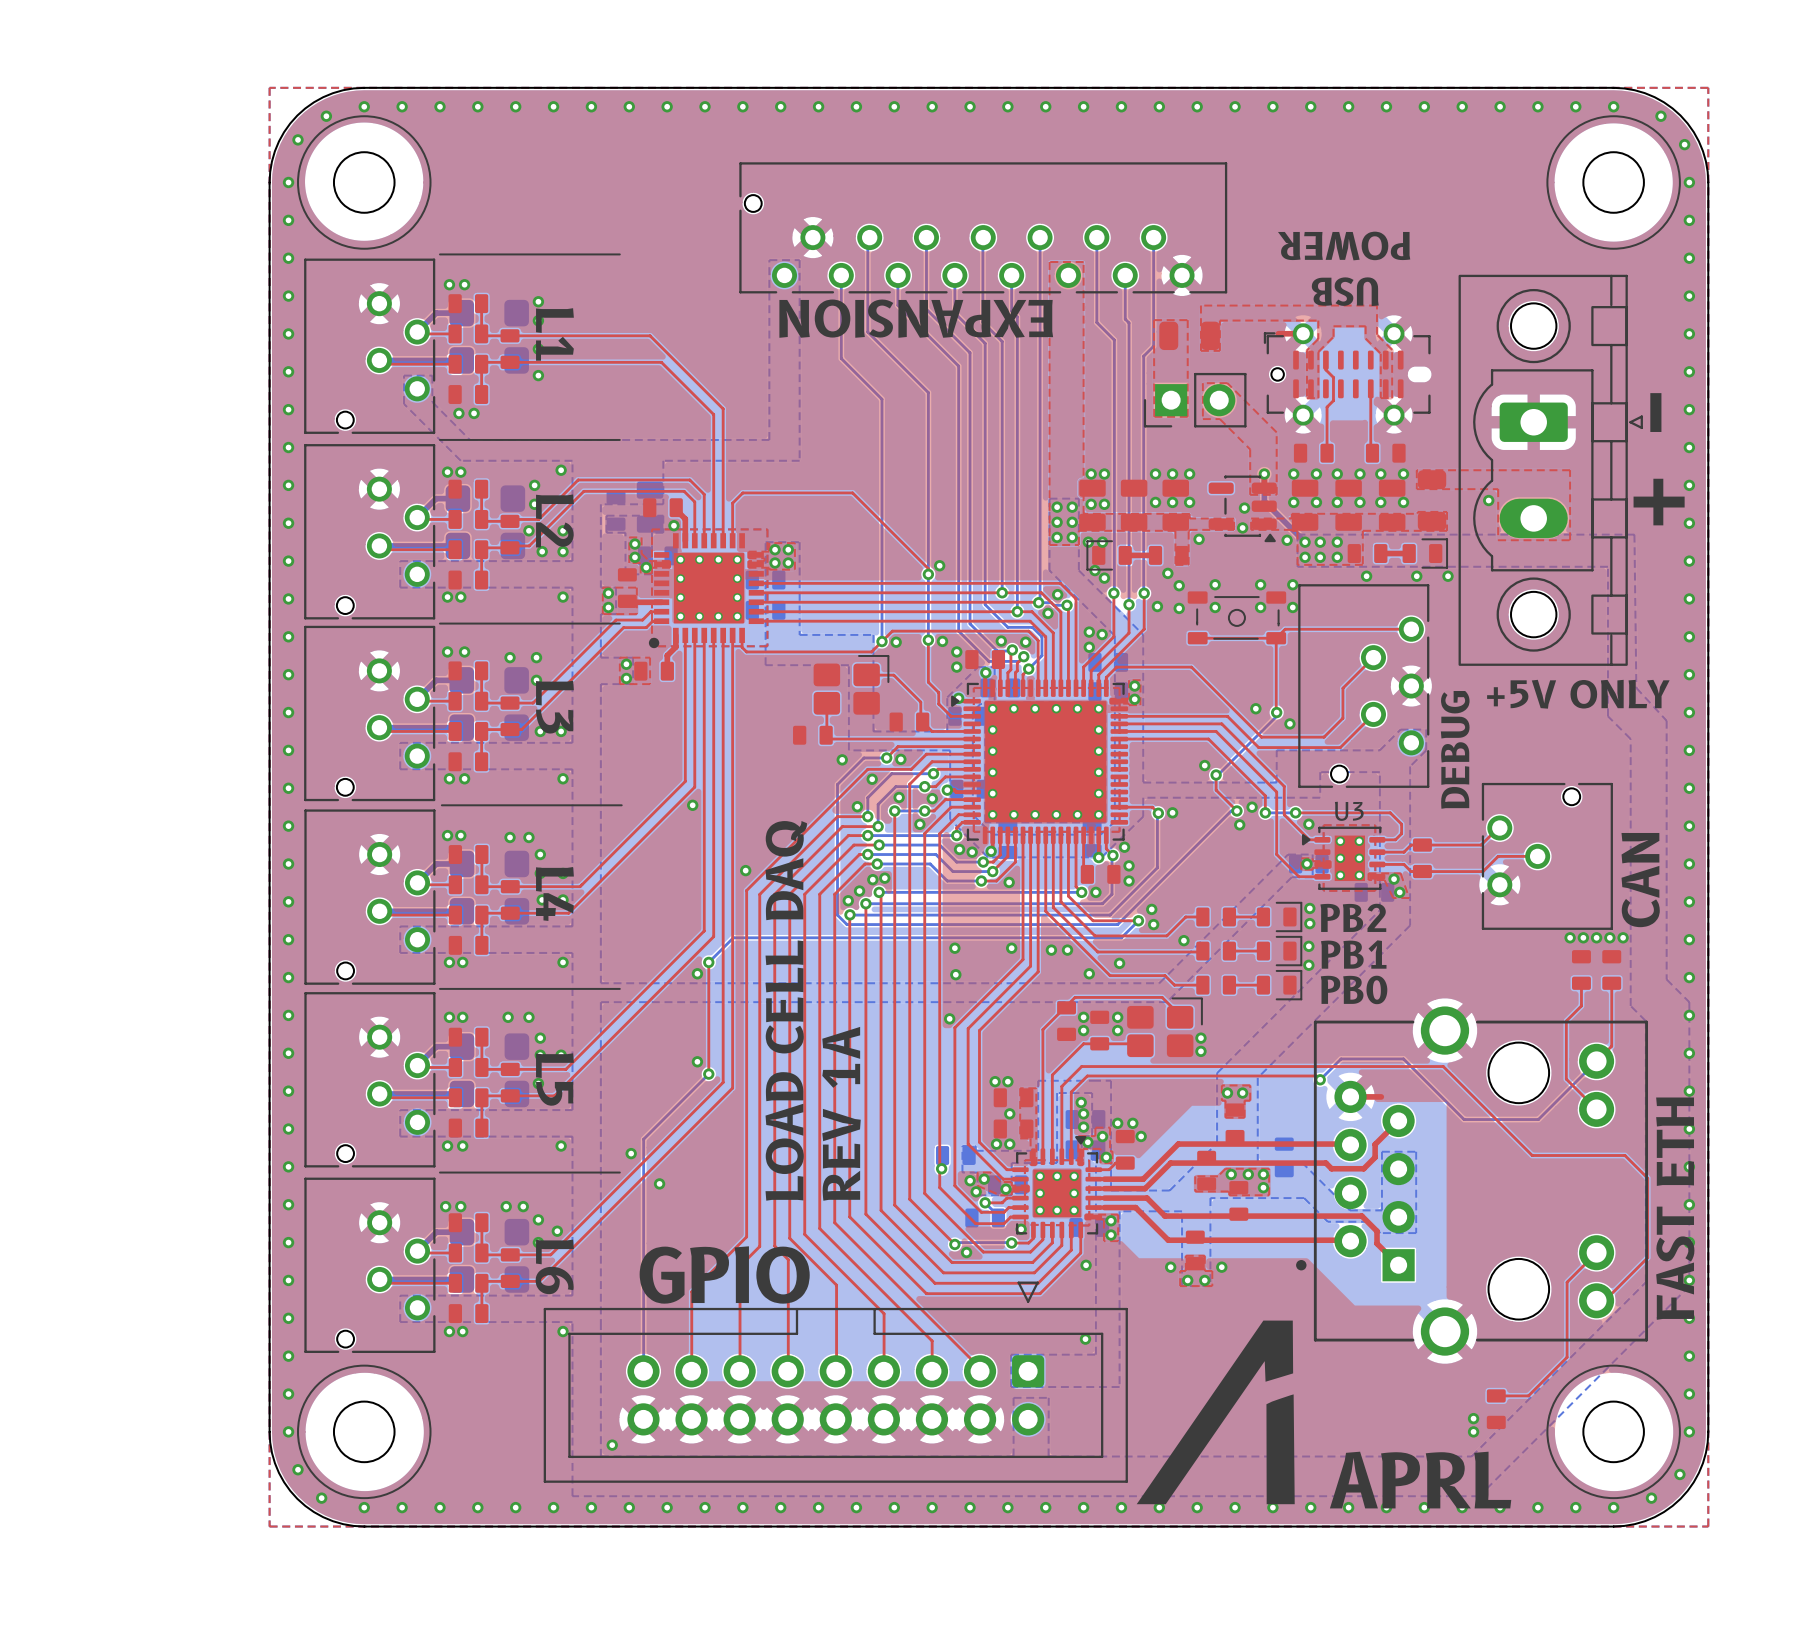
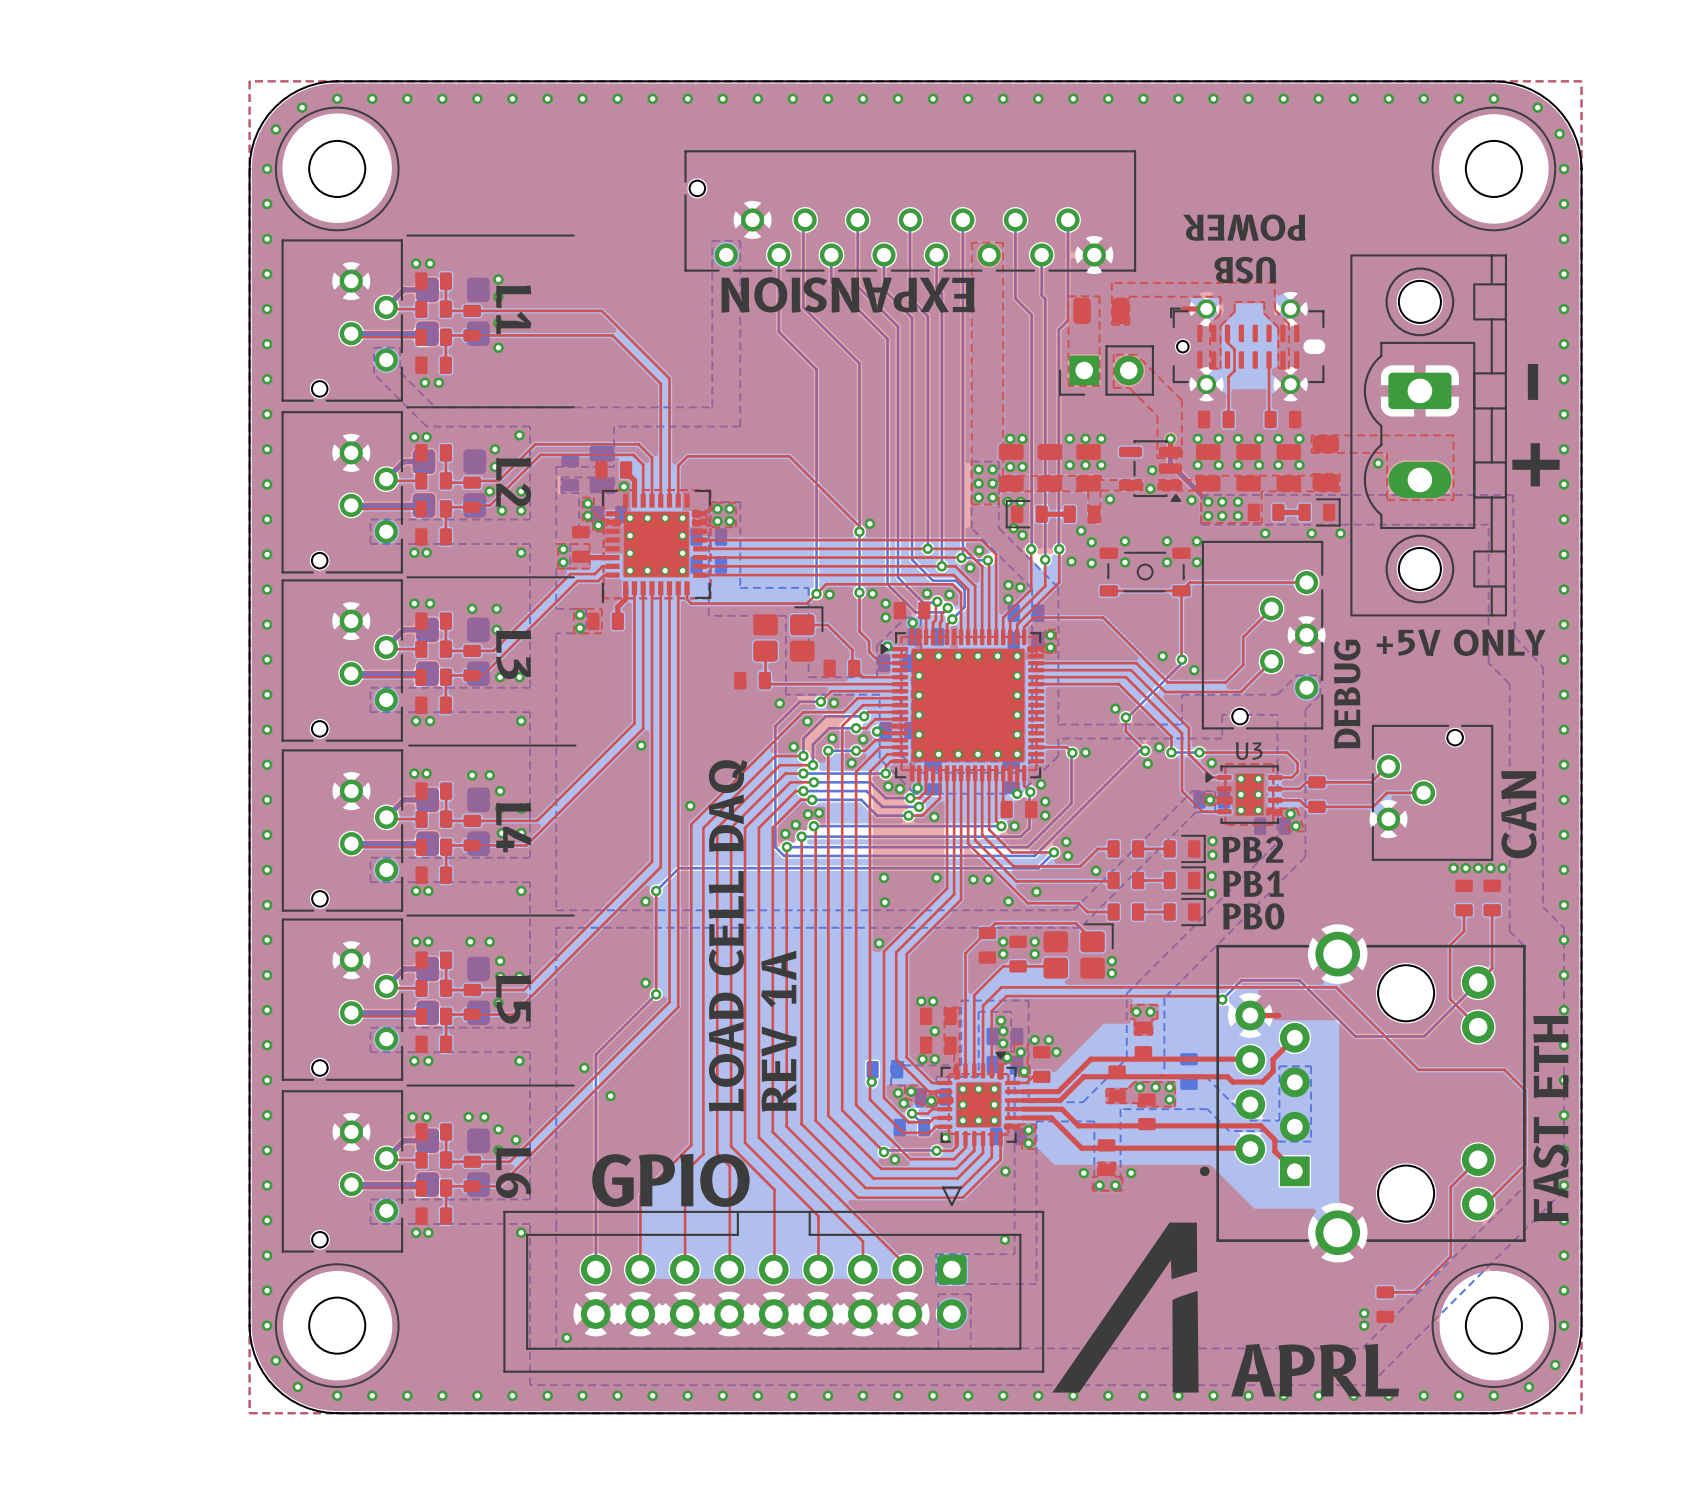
part footprint: [1458, 274, 1643, 666] -> [1350, 254, 1508, 617]
part footprint: [648, 533, 764, 649] -> [601, 489, 711, 604]

